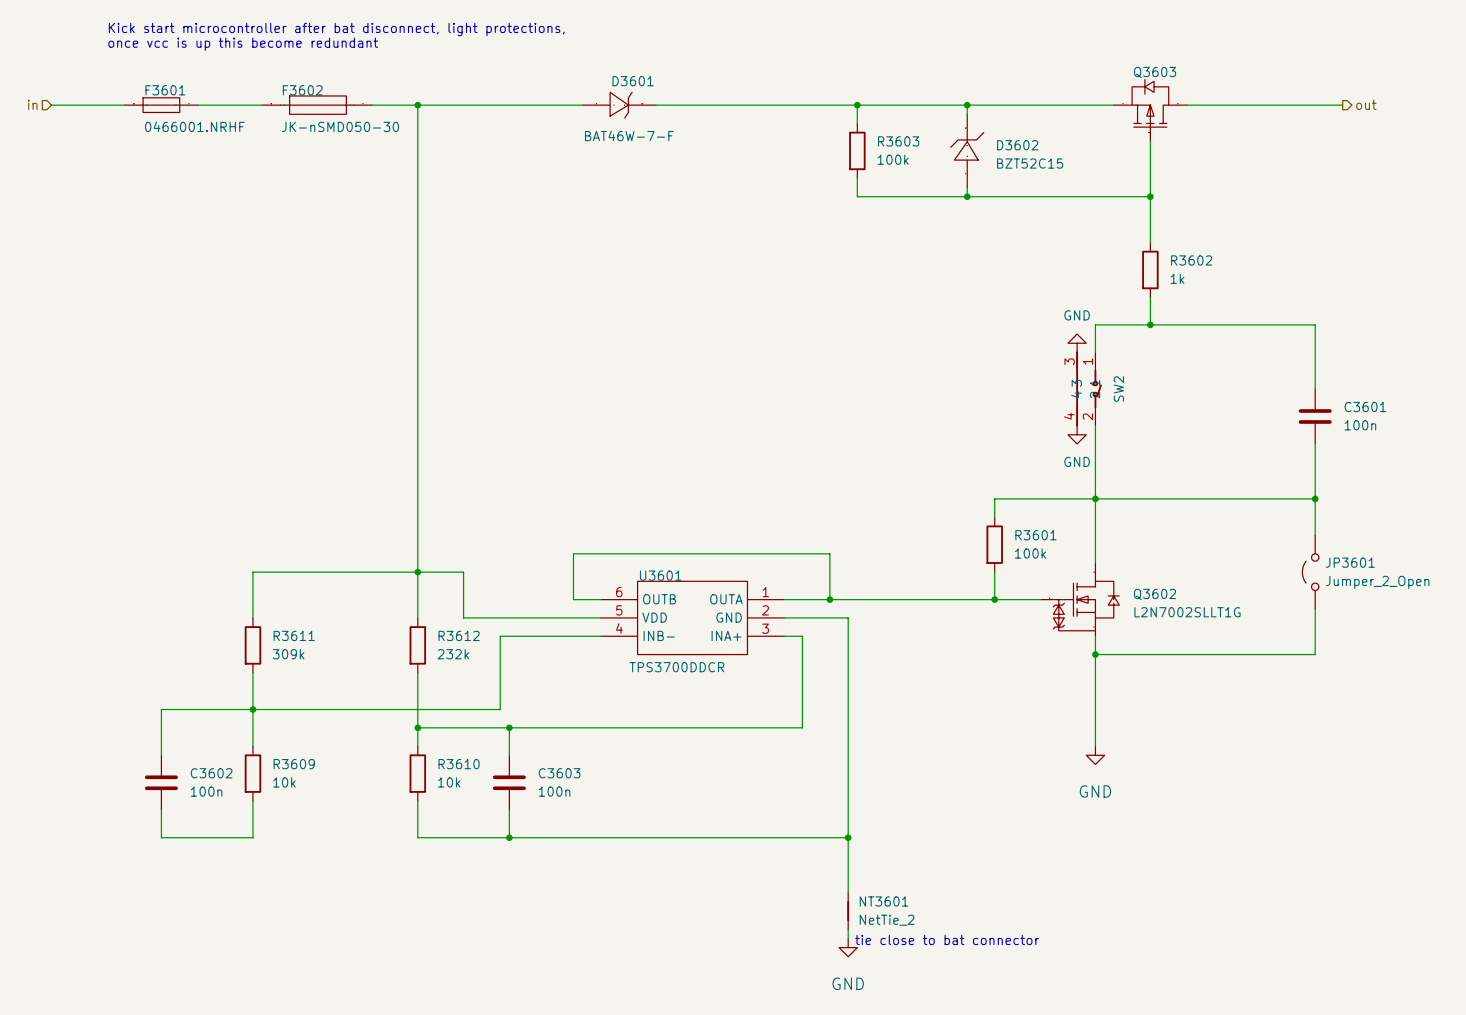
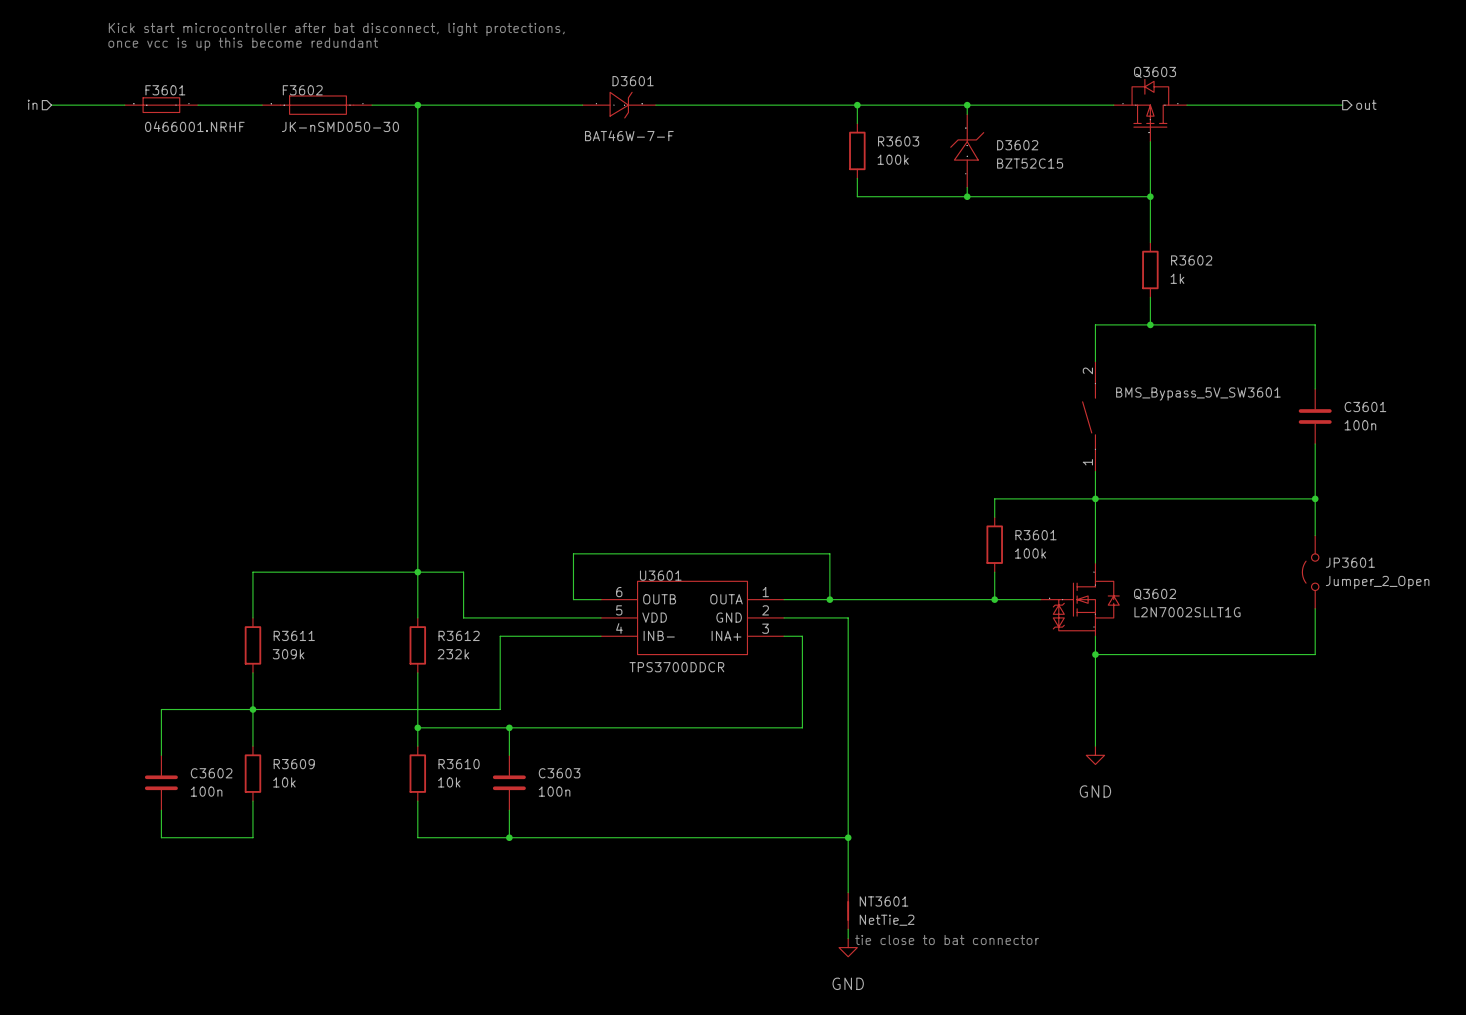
power symbol: GND (1077, 343) -> none
SW2: (1089, 389) -> none
BMS_Bypass_5V_SW3601: none -> (1089, 416)
power symbol: GND (1077, 434) -> none

